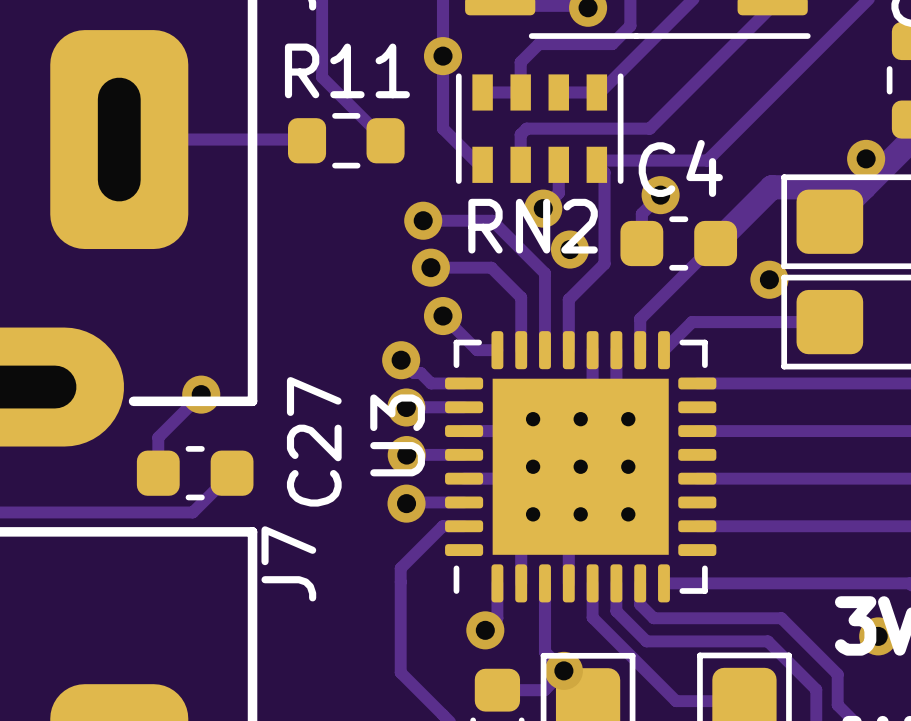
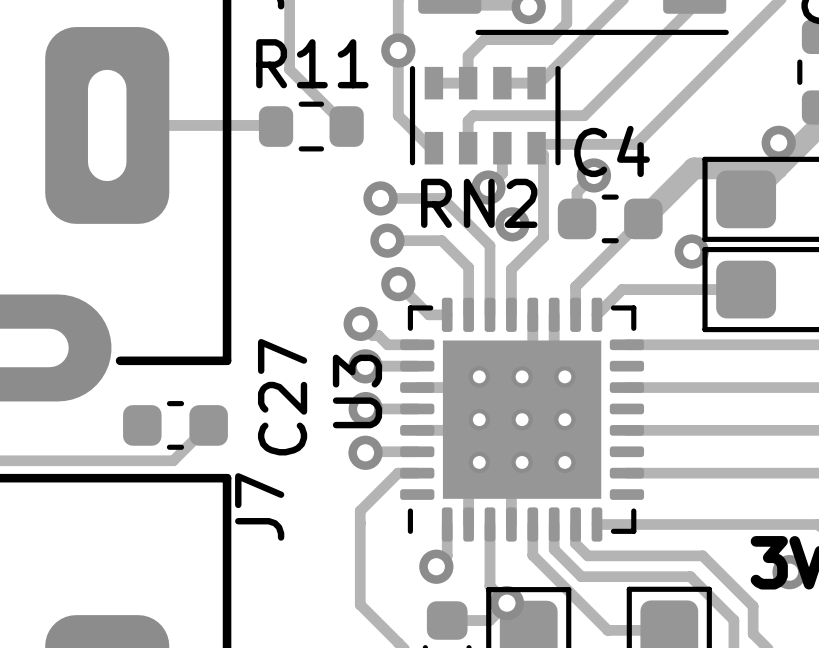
track: (201, 394) (158, 437) (158, 473) -> none
via: (201, 394) -> none

